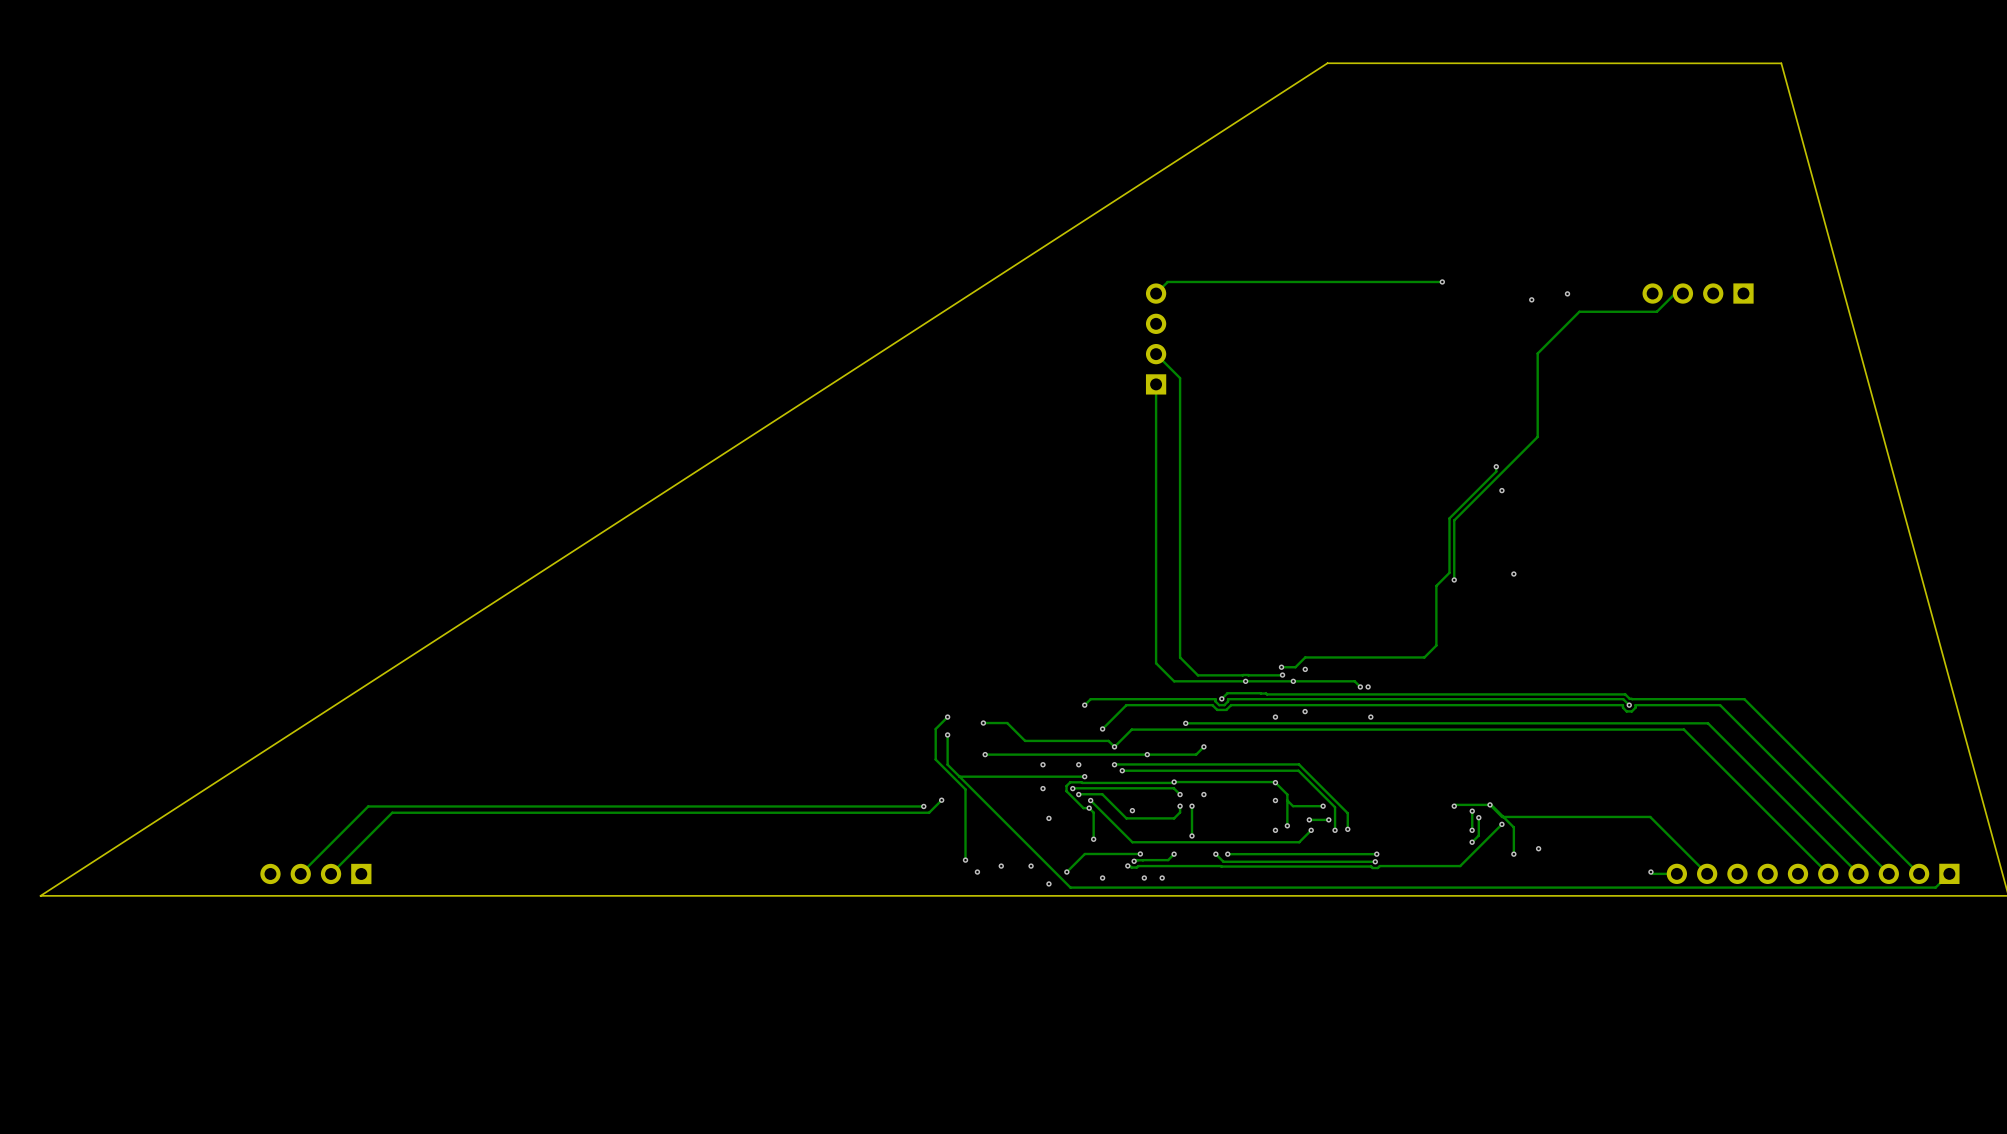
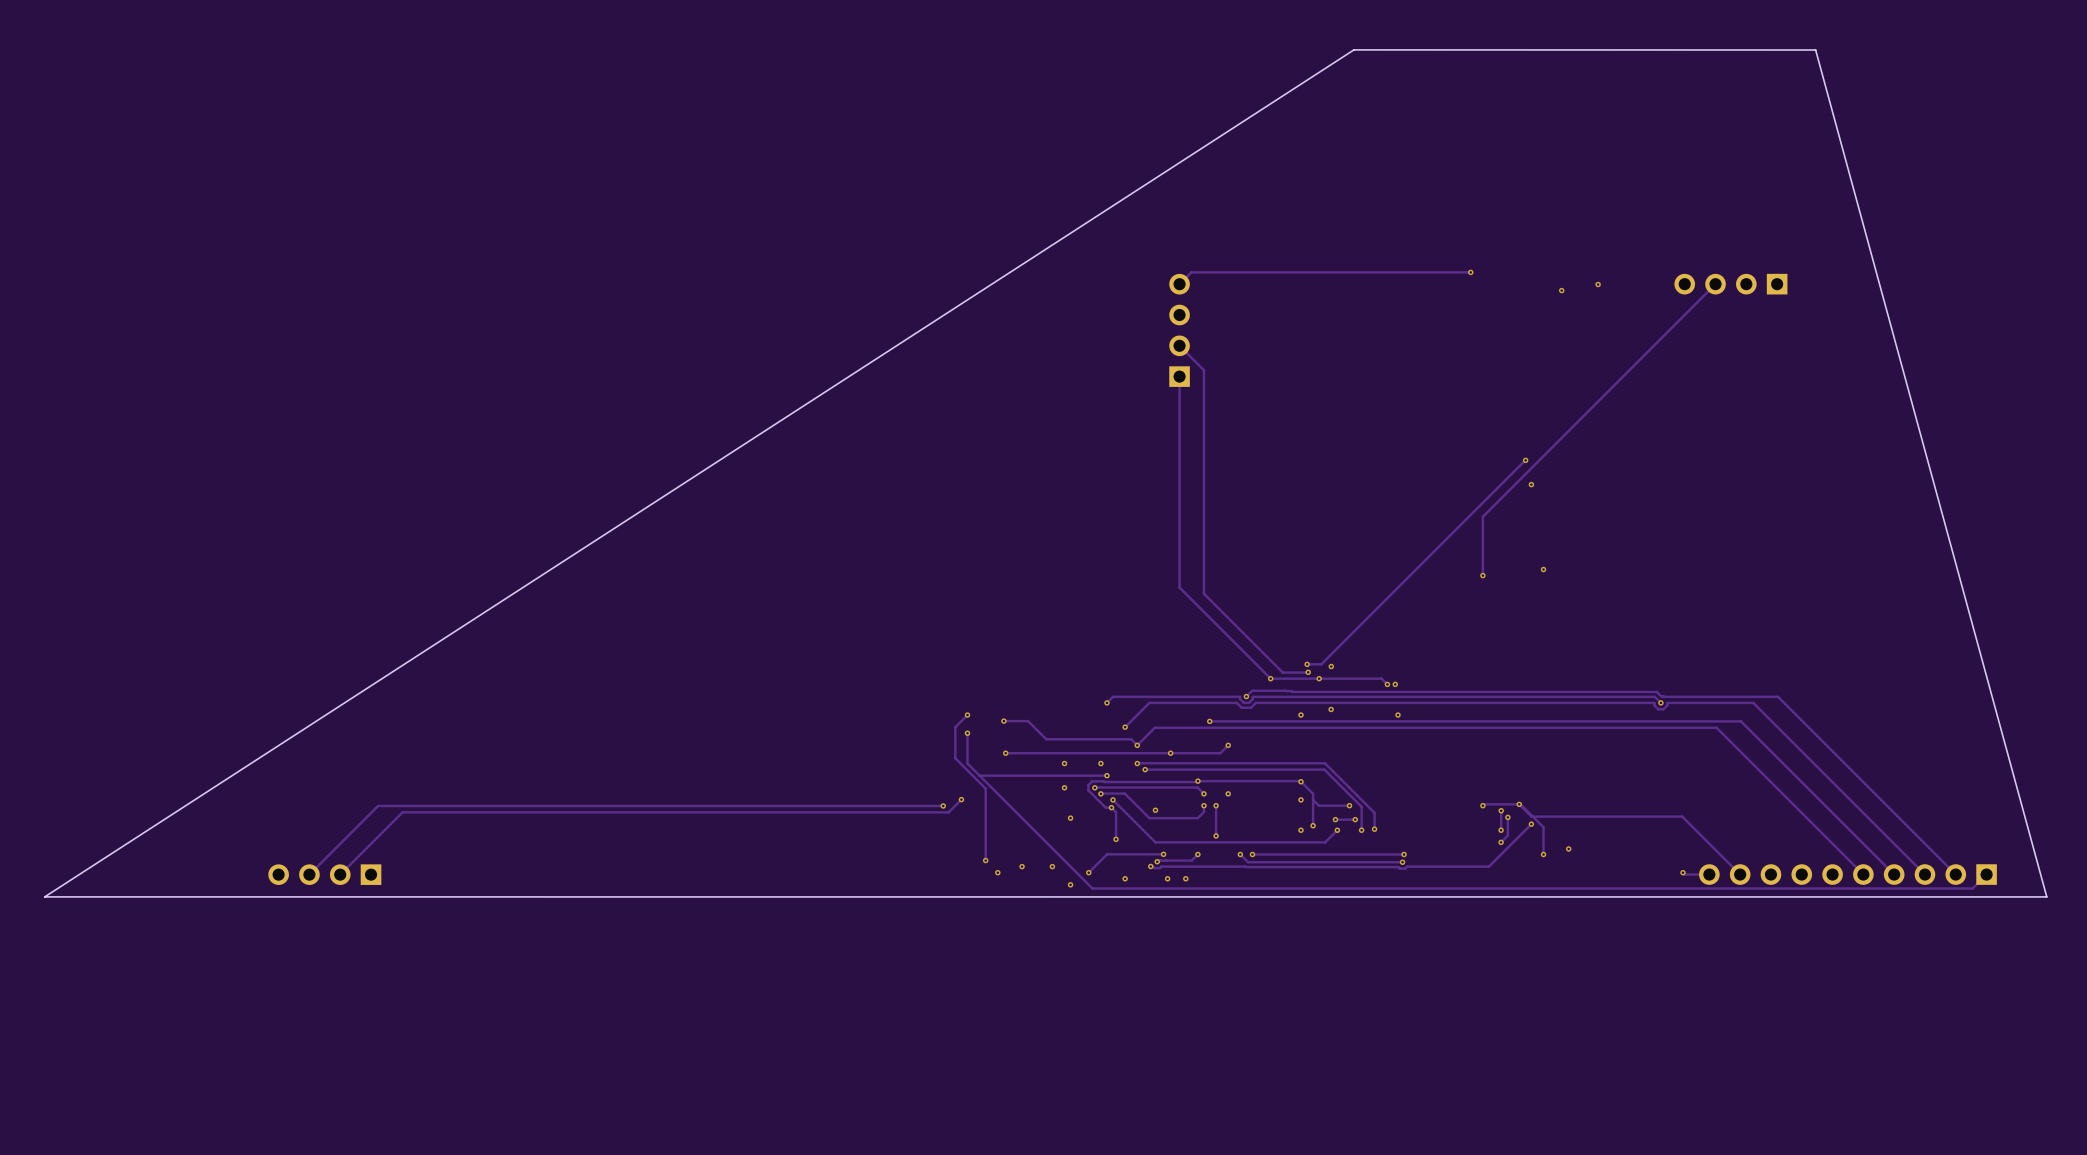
track: (1682, 293) (1675, 293) (1656, 311) (1579, 311) (1537, 353) (1537, 436) (1454, 522) -> (1715, 284) (1482, 516)
track: (1496, 466) (1496, 471) (1449, 518) (1449, 572) (1436, 585) (1436, 645) (1424, 657) (1305, 657) -> (1525, 460) (1331, 654)
track: (1156, 591) (1156, 663) (1174, 681) (1245, 681) -> (1179, 587) (1270, 678)
track: (1180, 597) (1180, 657) (1197, 675) (1257, 675) -> (1203, 593) (1282, 672)

